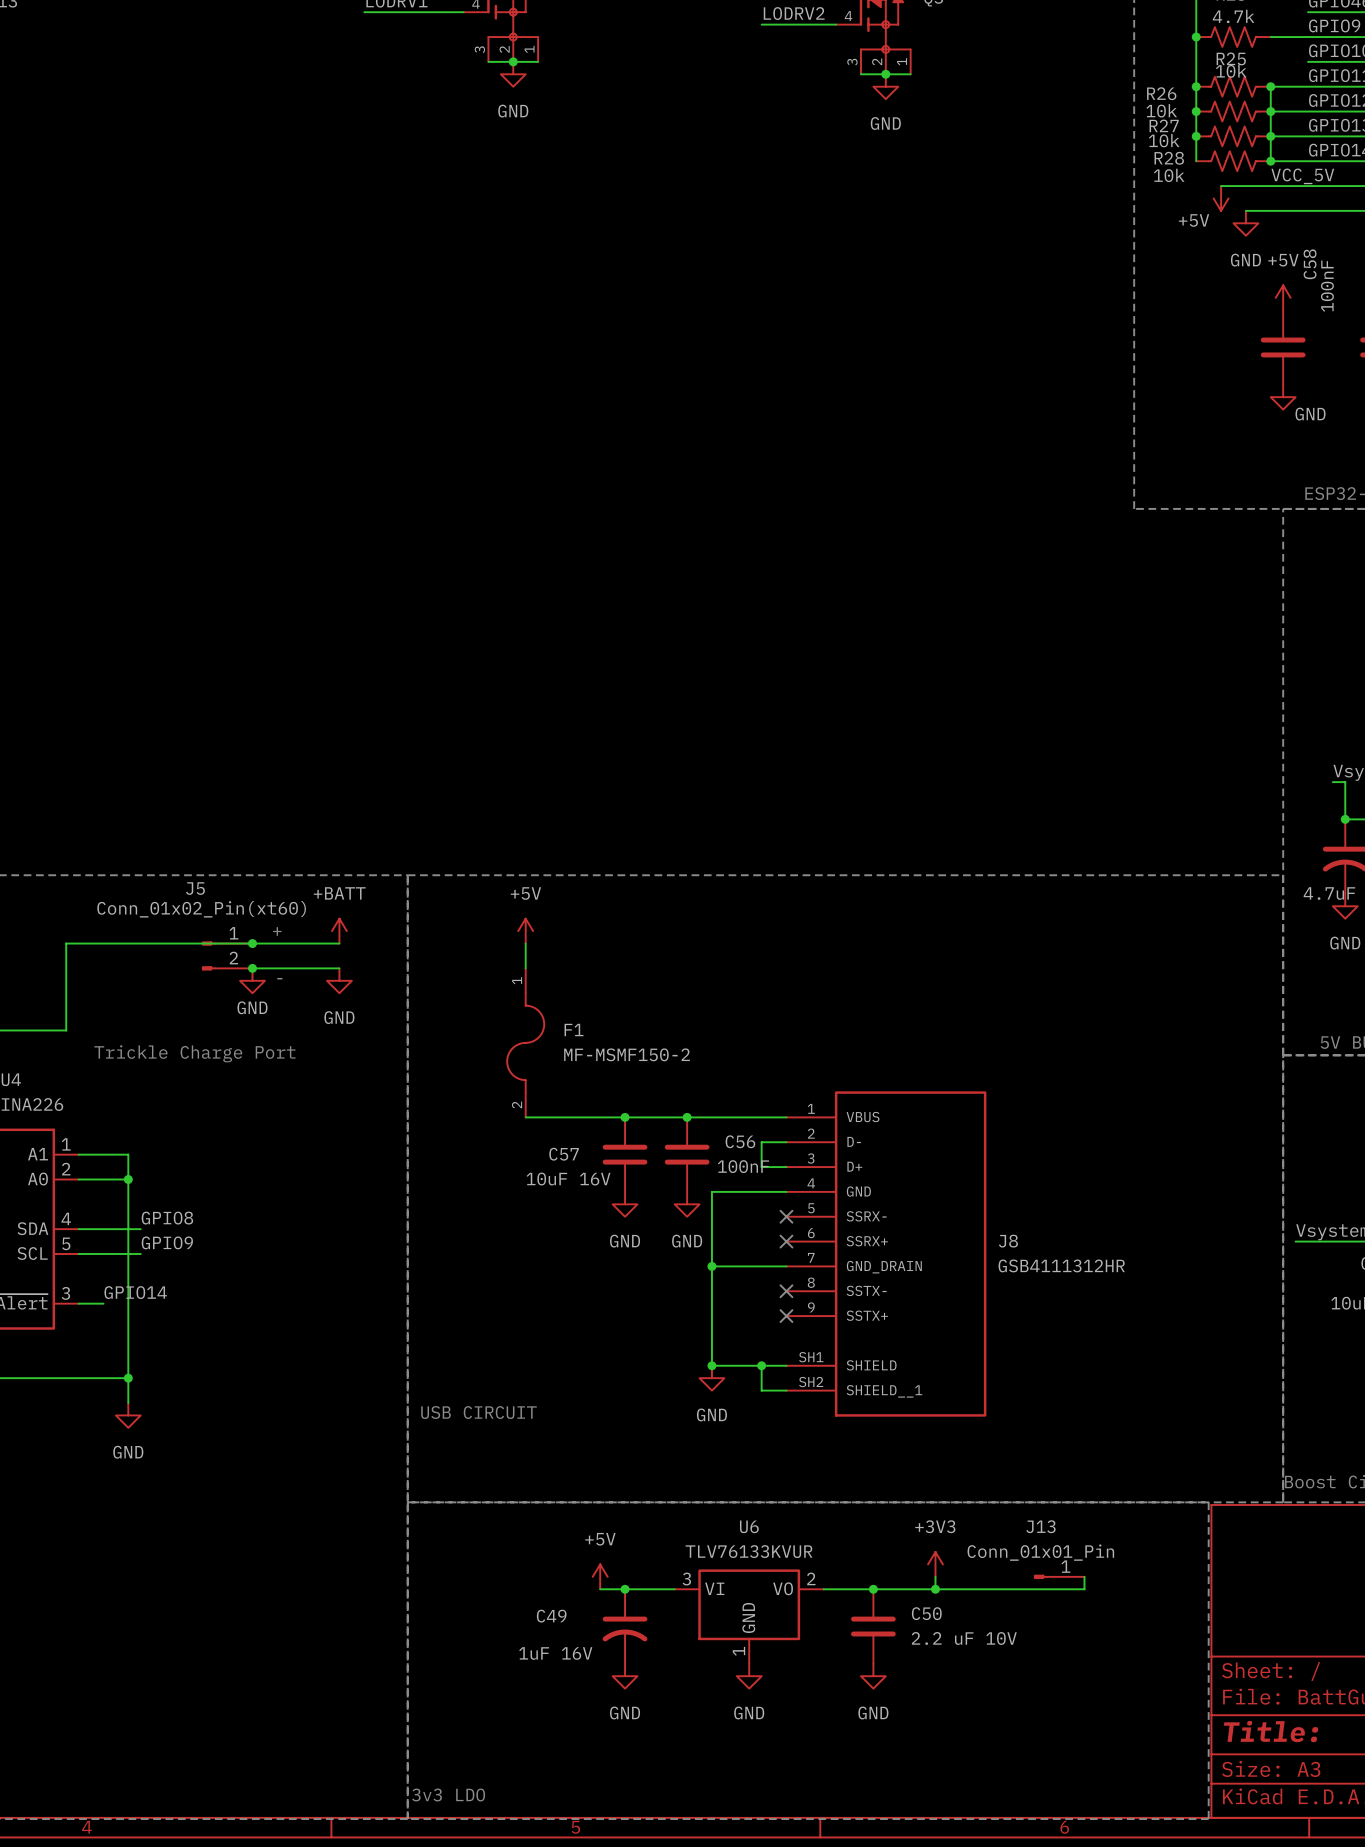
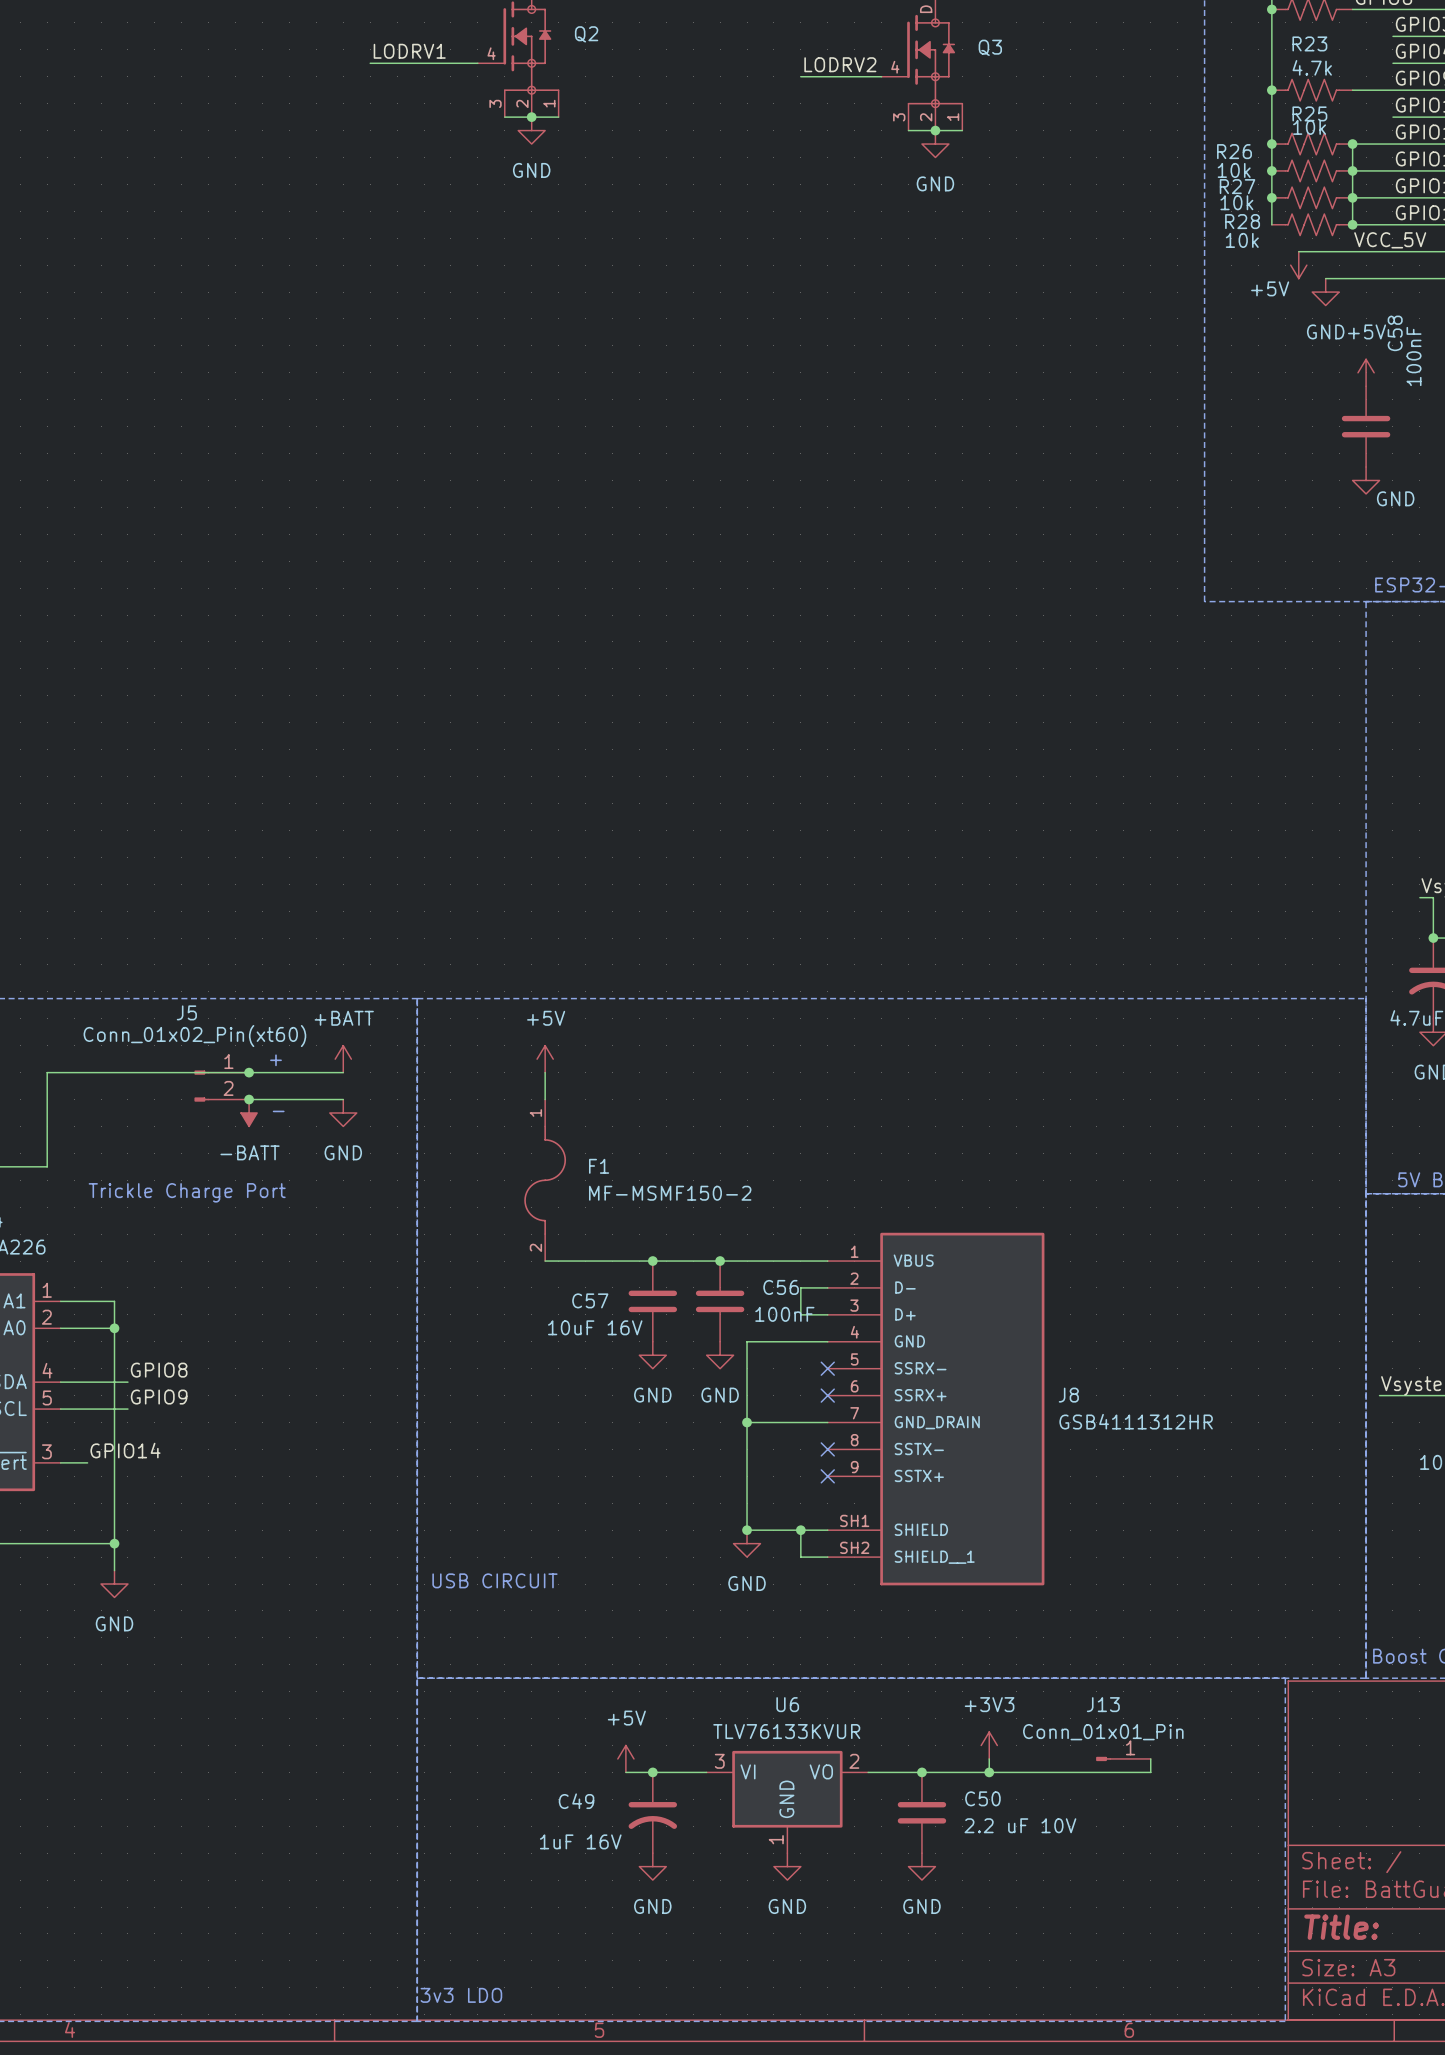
power symbol: GND (252, 980) -> -BATT (249, 1112)

